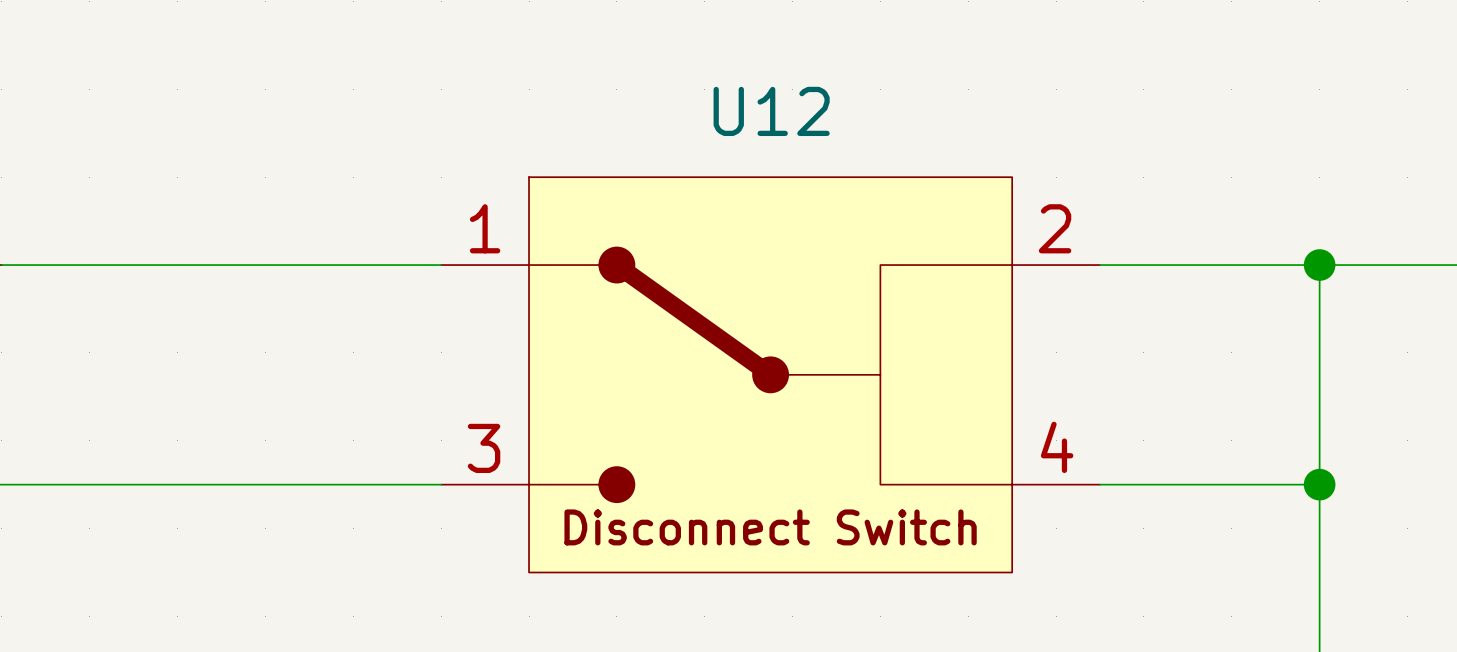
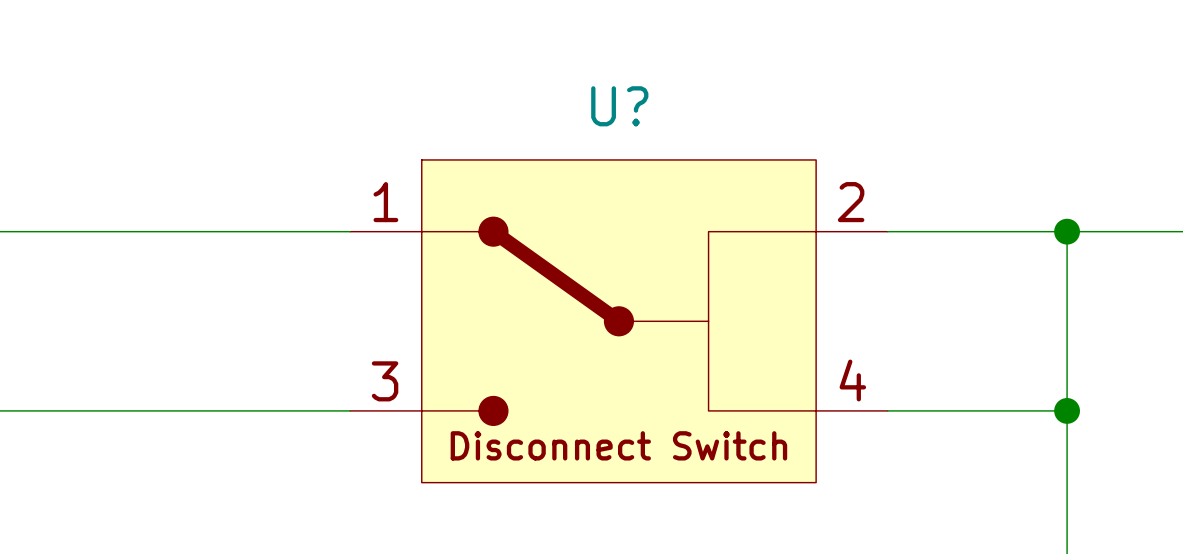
U12 name: U12 (771, 111) -> U? (619, 106)

